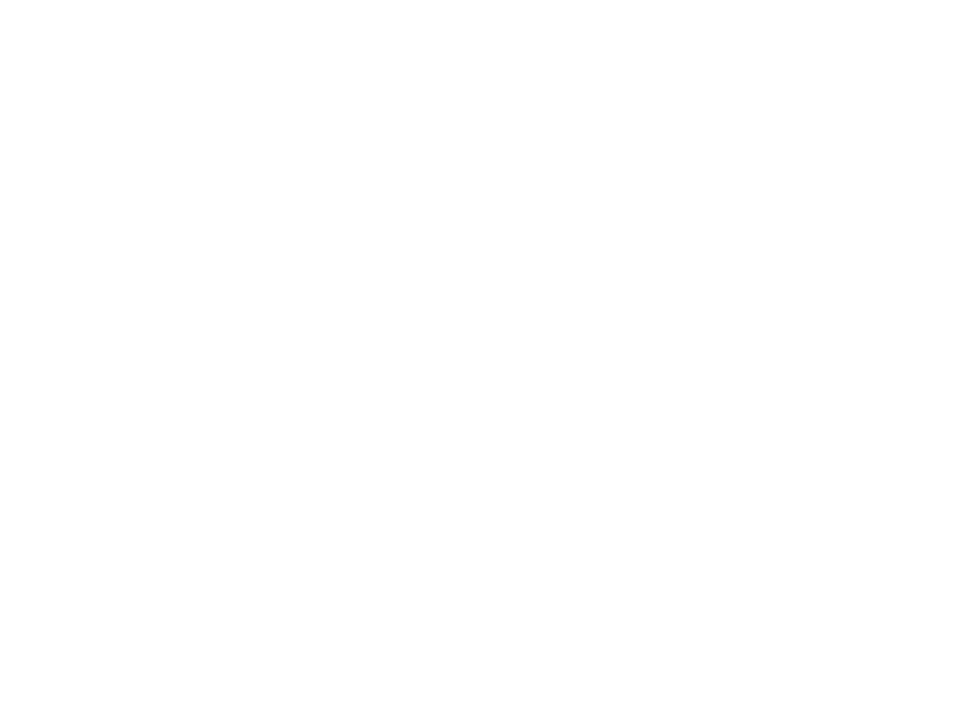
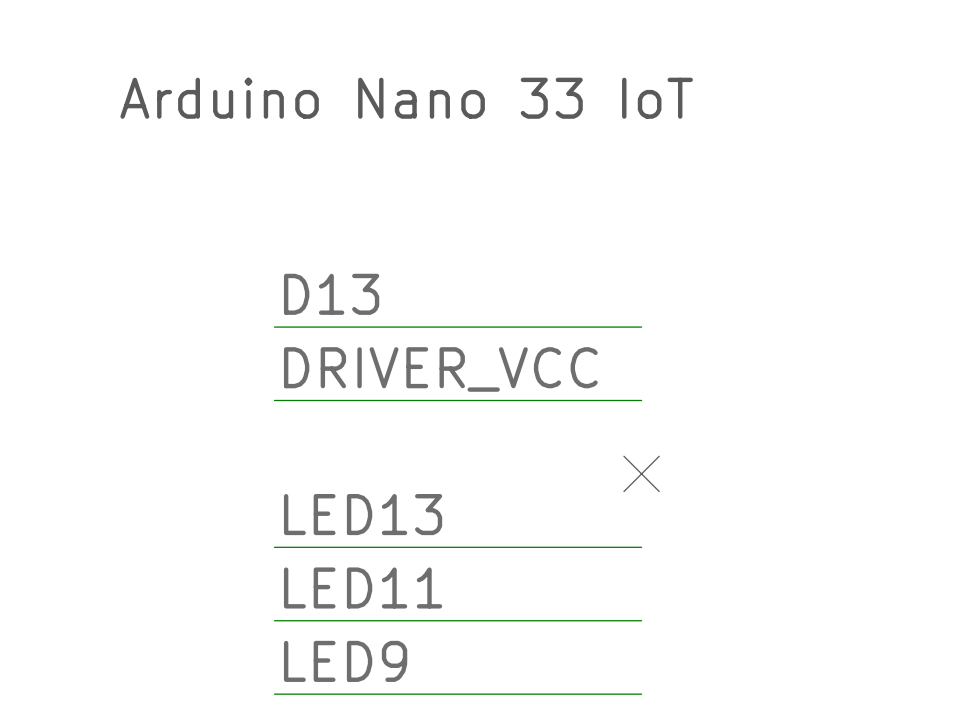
text: none -> Arduino Nano 33 IoT (406, 98)
label: none -> D13 (331, 294)
wire: none -> (274, 327) (641, 327)
label: none -> DRIVER_VCC (440, 369)
wire: none -> (274, 400) (641, 400)
no-connect mark: none -> (641, 473)
label: none -> LED13 (363, 514)
wire: none -> (274, 547) (641, 547)
label: none -> LED11 (363, 587)
wire: none -> (274, 620) (641, 620)
label: none -> LED9 (345, 661)
wire: none -> (274, 694) (641, 694)

